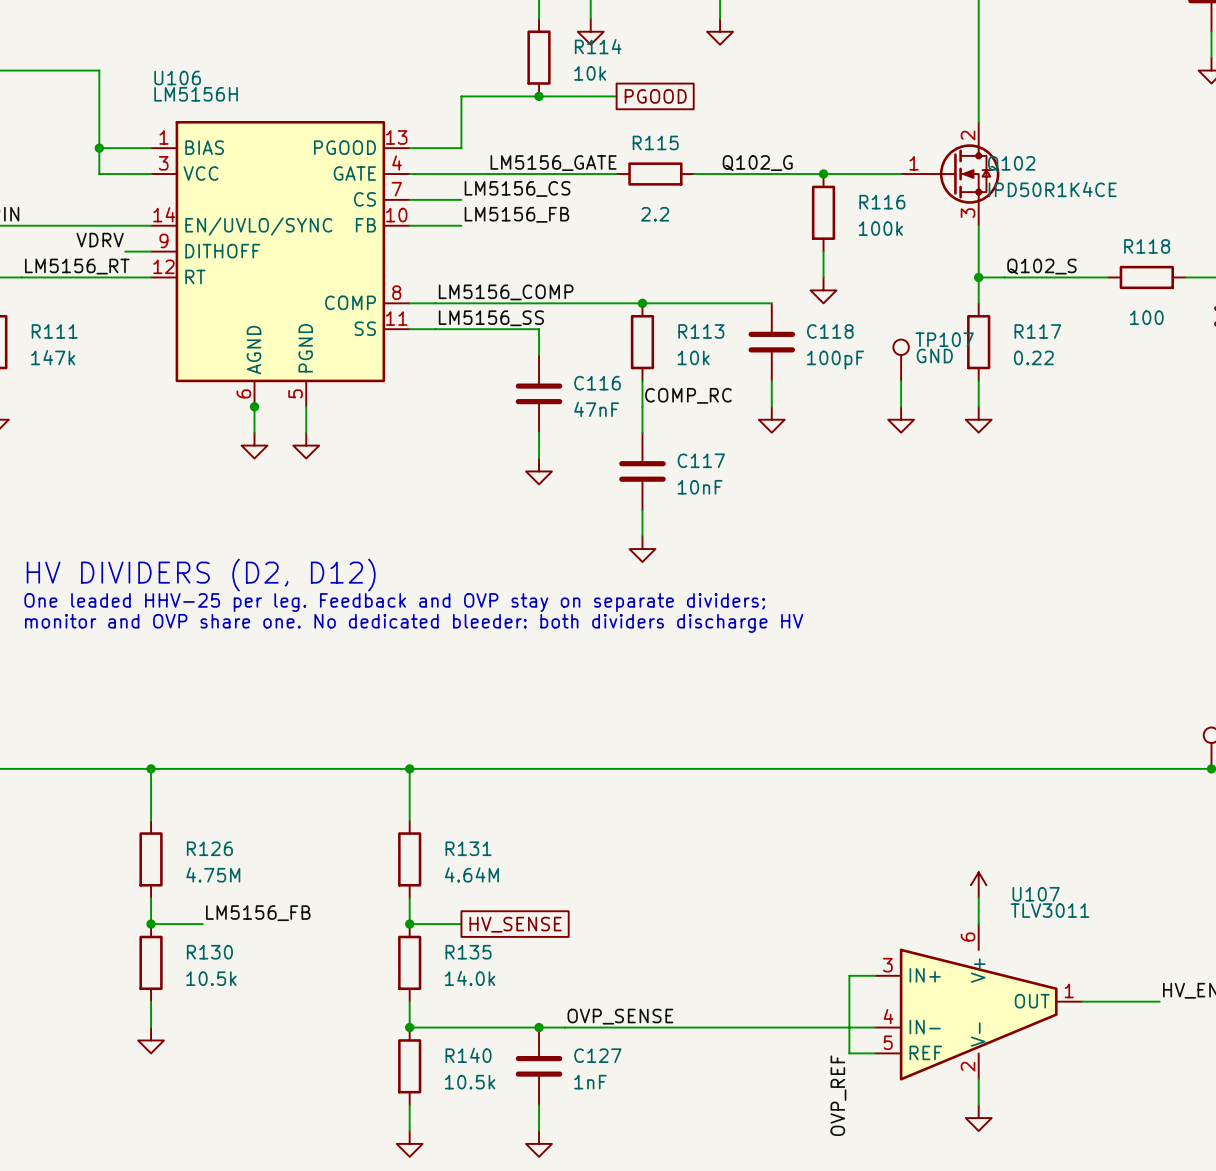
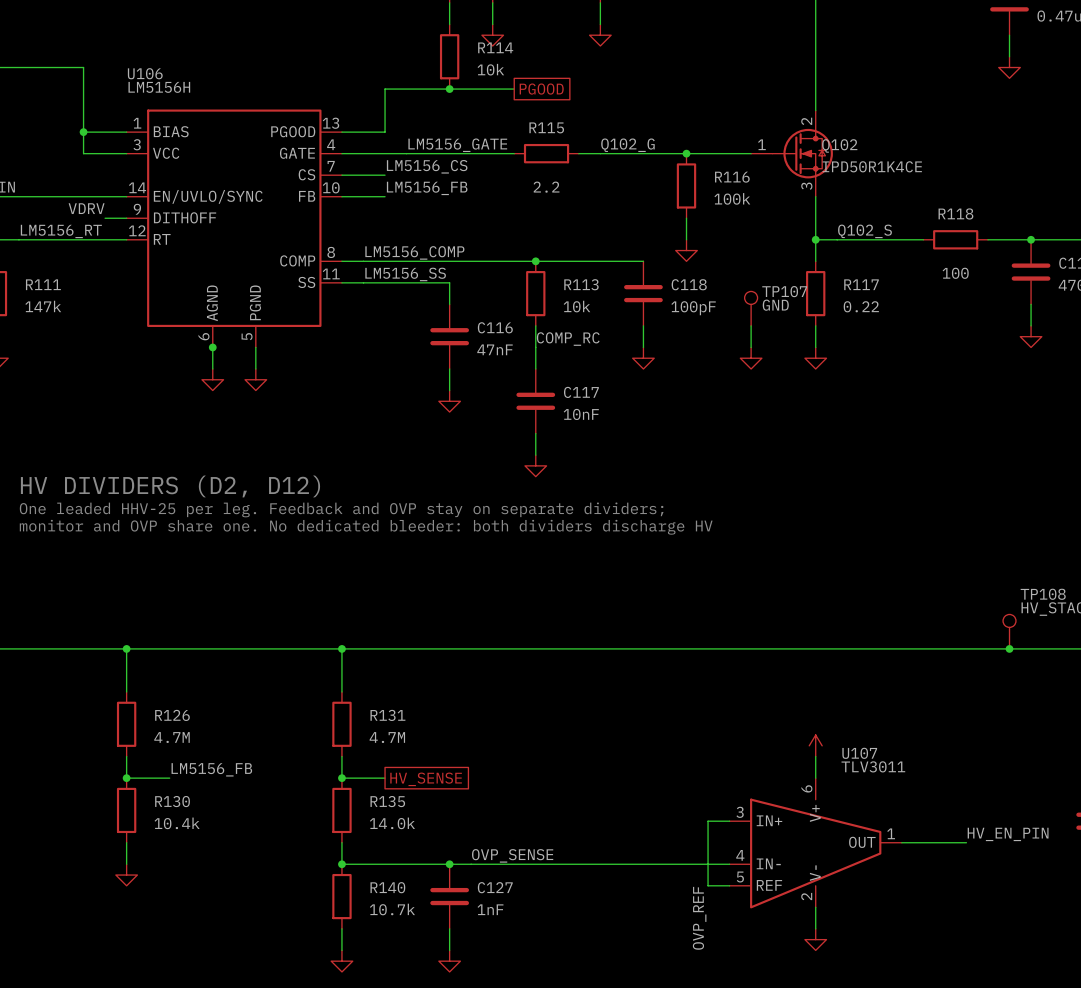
R126 value: 4.75M (213, 874) -> 4.7M (172, 737)
R131 value: 4.64M (471, 874) -> 4.7M (387, 737)
R130 value: 10.5k (211, 978) -> 10.4k (177, 823)
R140 value: 10.5k (470, 1082) -> 10.7k (392, 909)

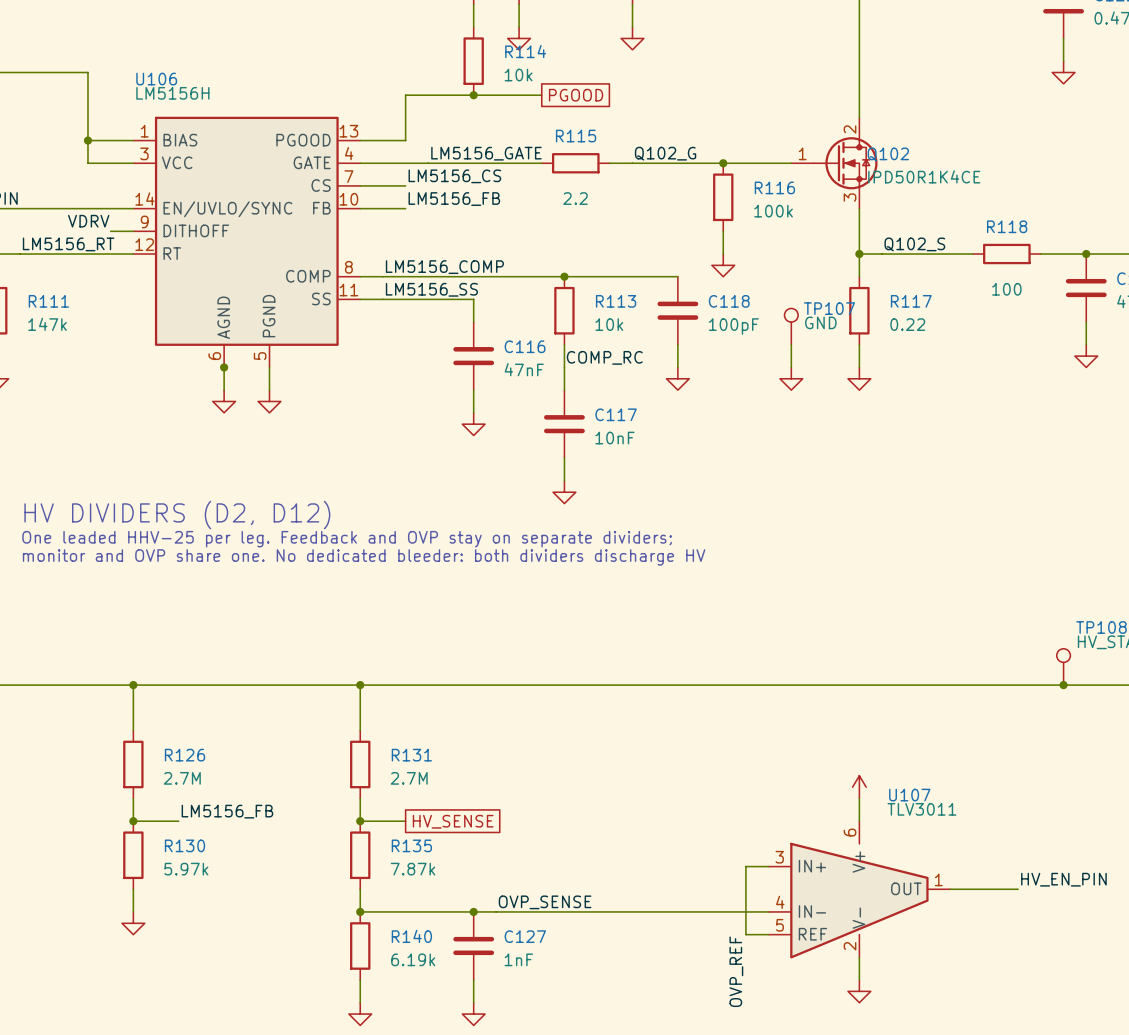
R126 value: 4.7M (172, 737) -> 2.7M (182, 778)
R131 value: 4.7M (387, 737) -> 2.7M (409, 778)
R130 value: 10.4k (177, 823) -> 5.97k (186, 869)
R135 value: 14.0k (392, 823) -> 7.87k (412, 869)
R140 value: 10.7k (392, 909) -> 6.19k (413, 959)

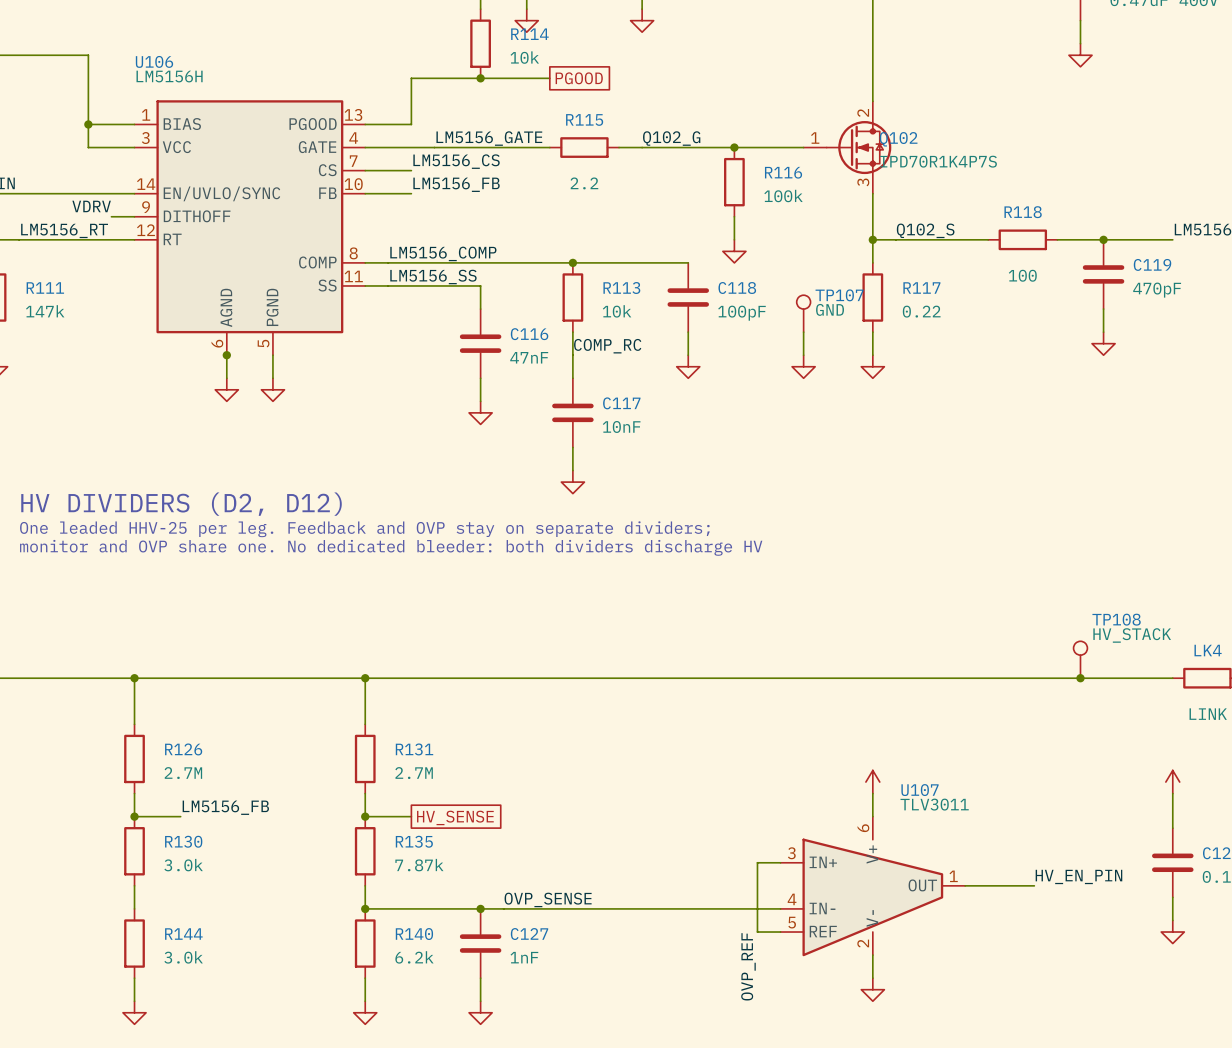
Q102 value: IPD50R1K4CE (924, 176) -> IPD70R1K4P7S (938, 161)
R130 value: 5.97k (186, 869) -> 3.0k (183, 865)
power symbol position: (133, 923) -> (134, 1012)
R144: none -> 3.0k (134, 943)
R140 value: 6.19k (413, 959) -> 6.2k (414, 957)
wire: none -> (134, 978) (134, 1001)

